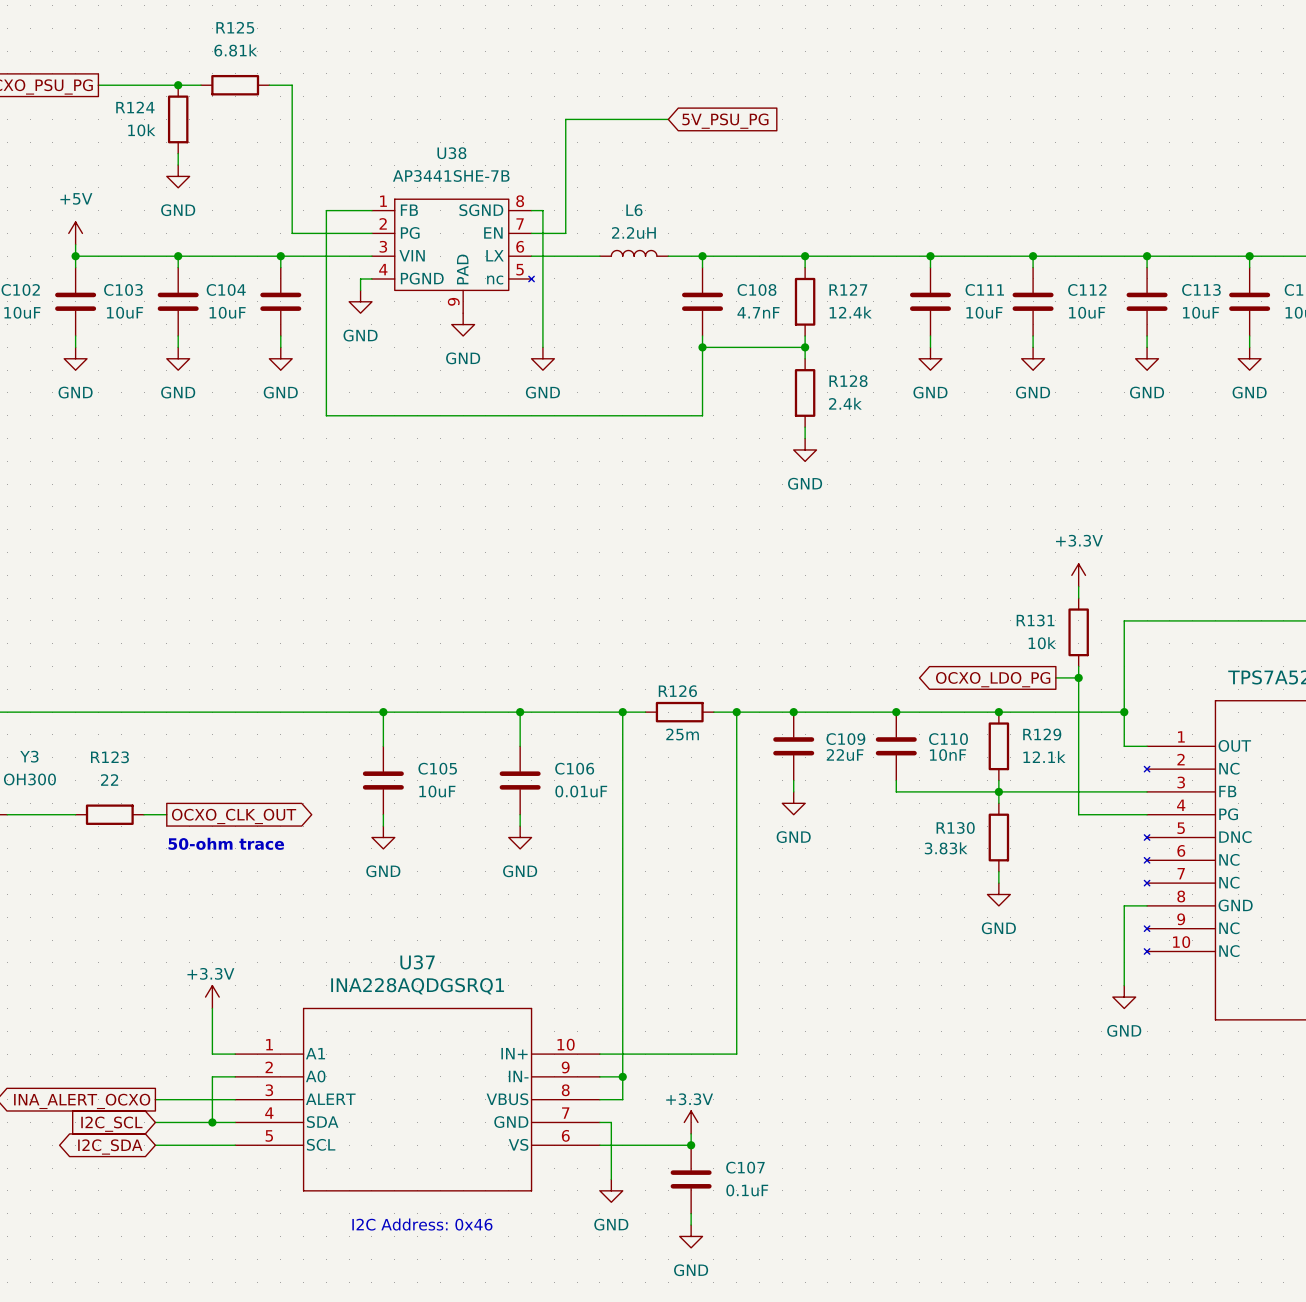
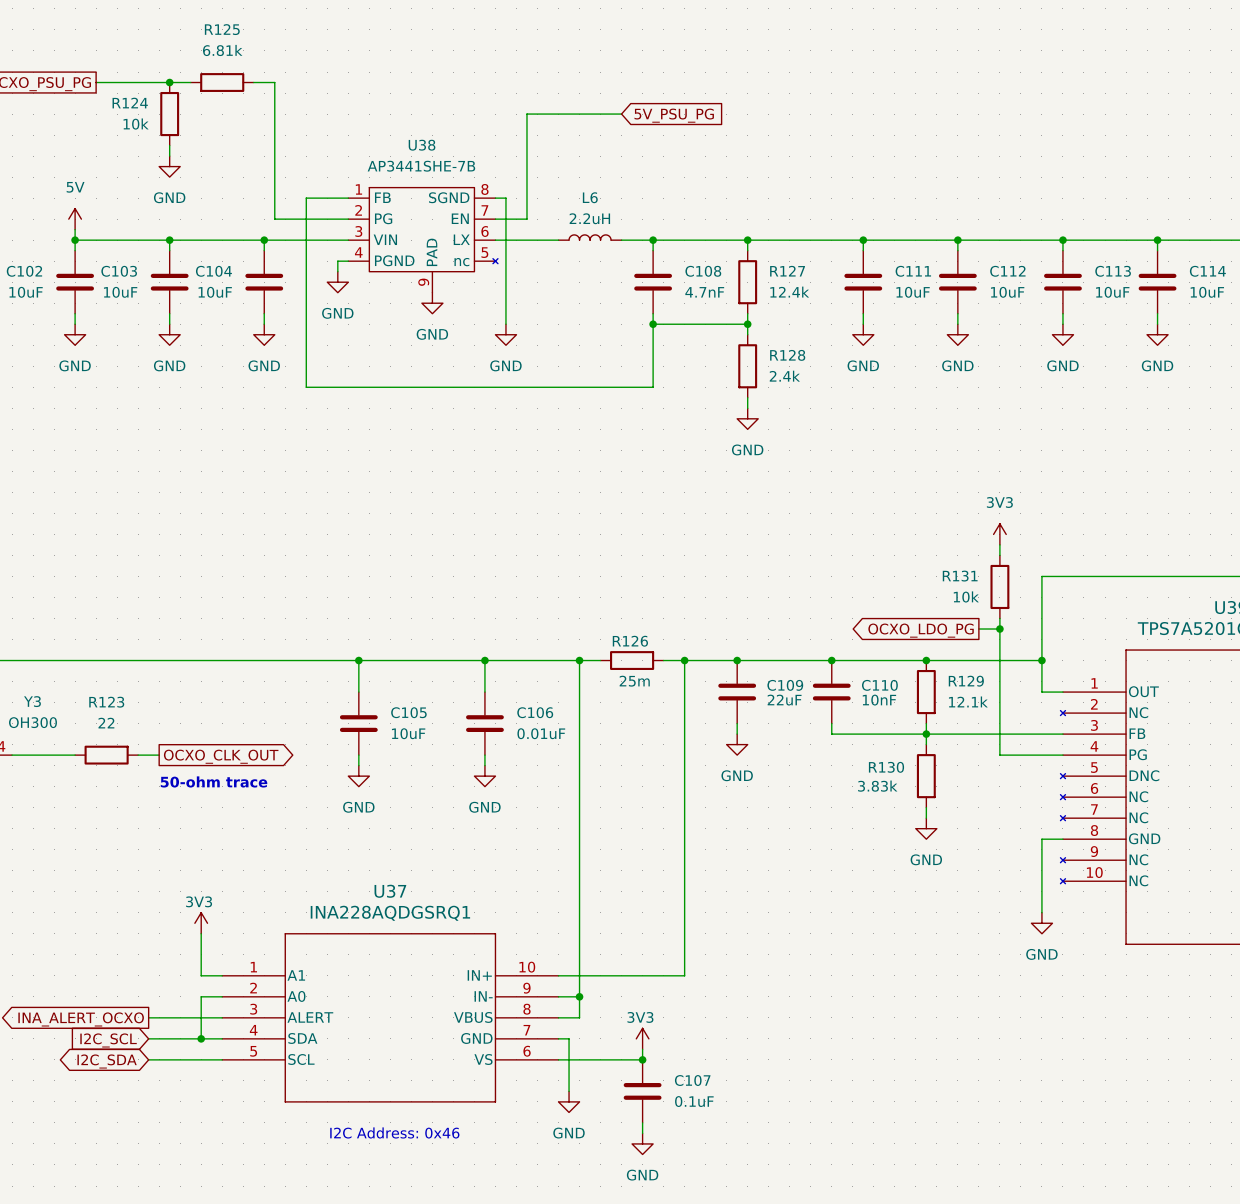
power symbol: +5V (75, 233) -> 5V (75, 219)
power symbol: +3.3V (1078, 575) -> 3V3 (999, 534)
power symbol: +3.3V (212, 997) -> 3V3 (201, 923)
power symbol: +3.3V (691, 1122) -> 3V3 (642, 1038)

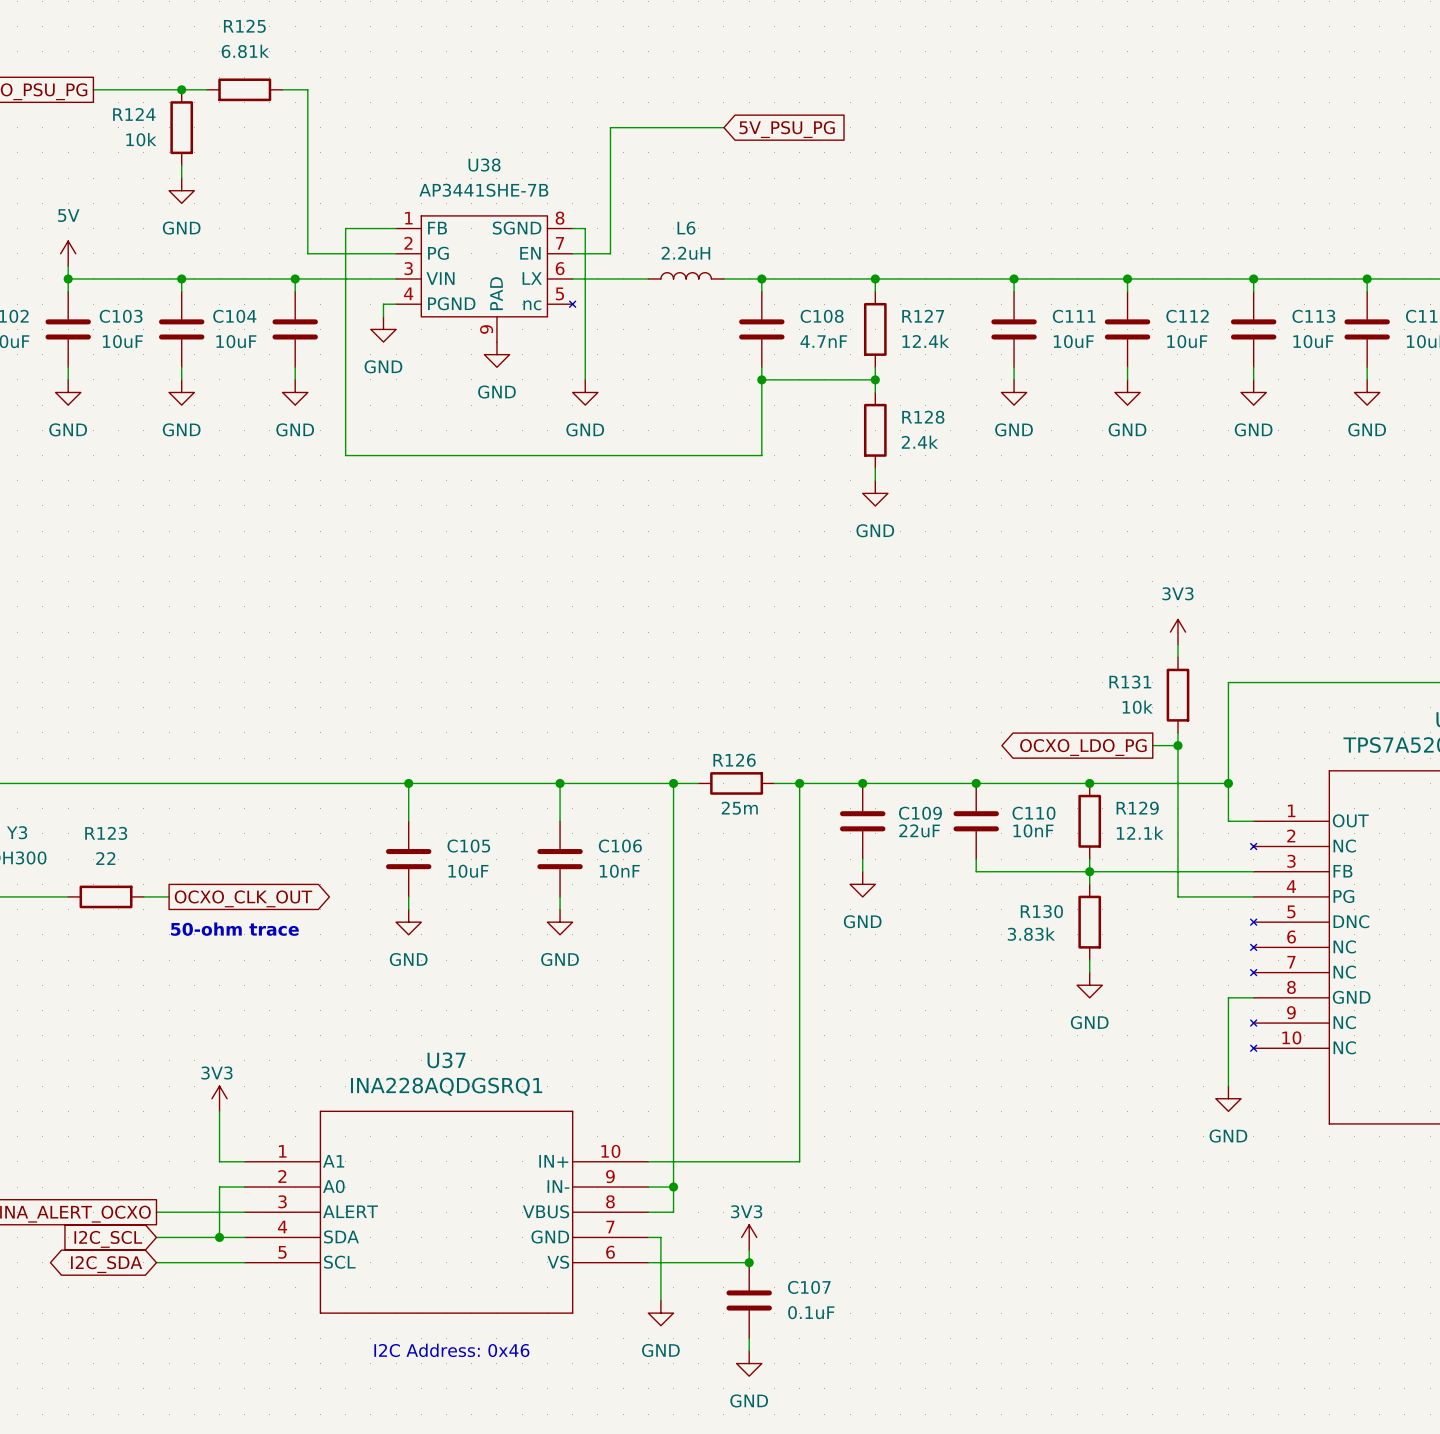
C106 value: 0.01uF (541, 733) -> 10nF (619, 871)

